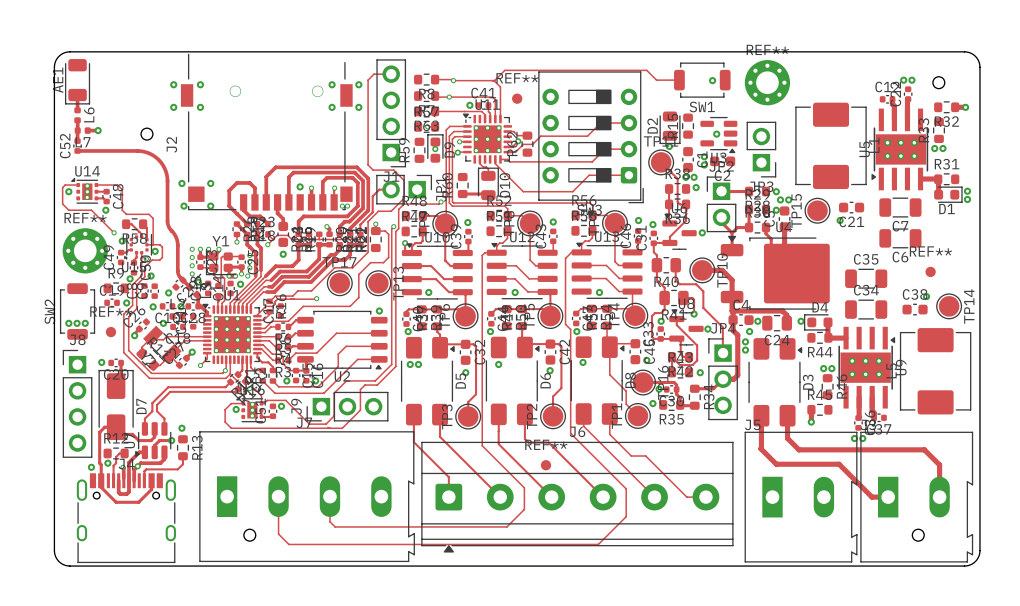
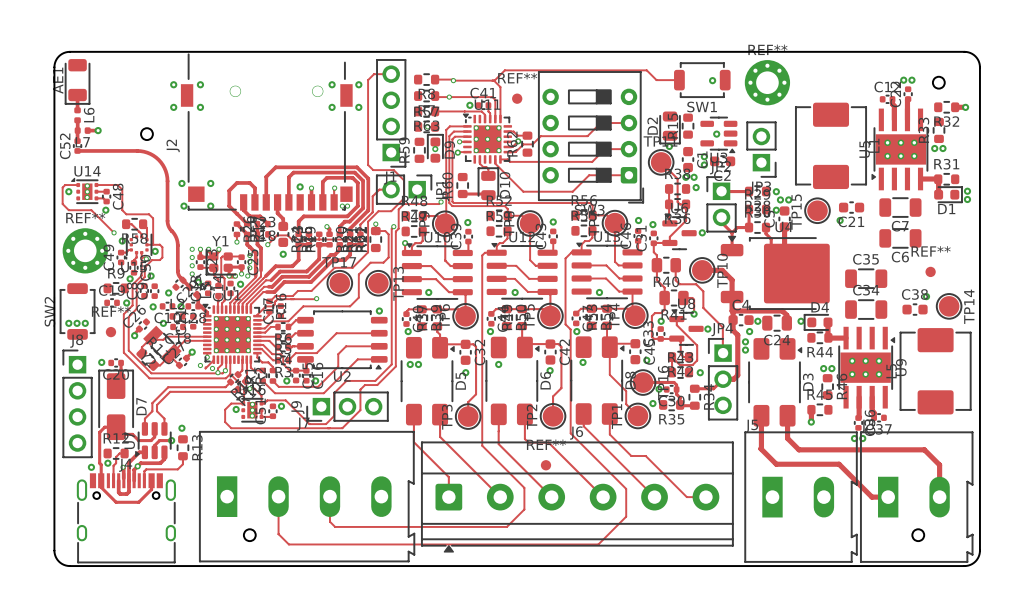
track: (207, 357) (200, 365) -> none
via: none -> (207, 357)
track: none -> (213, 359) (205, 367)
track: none -> (222, 359) (217, 372)
via: none -> (212, 368)
via: none -> (217, 372)

